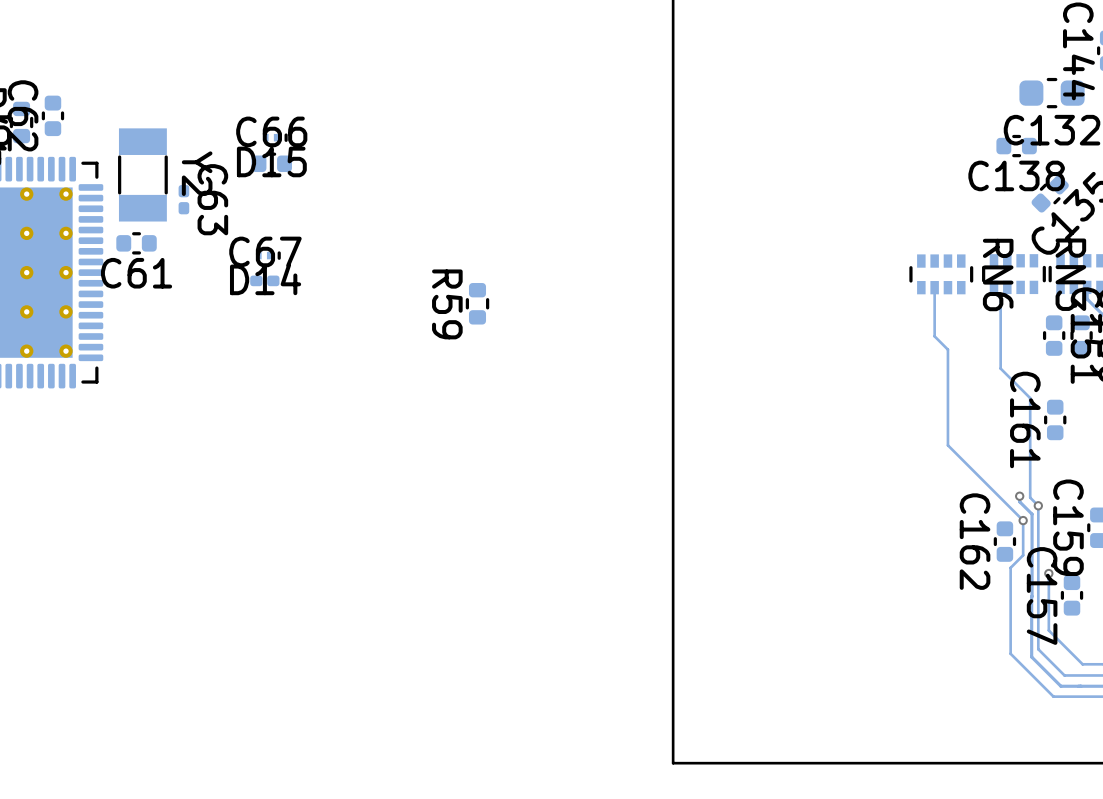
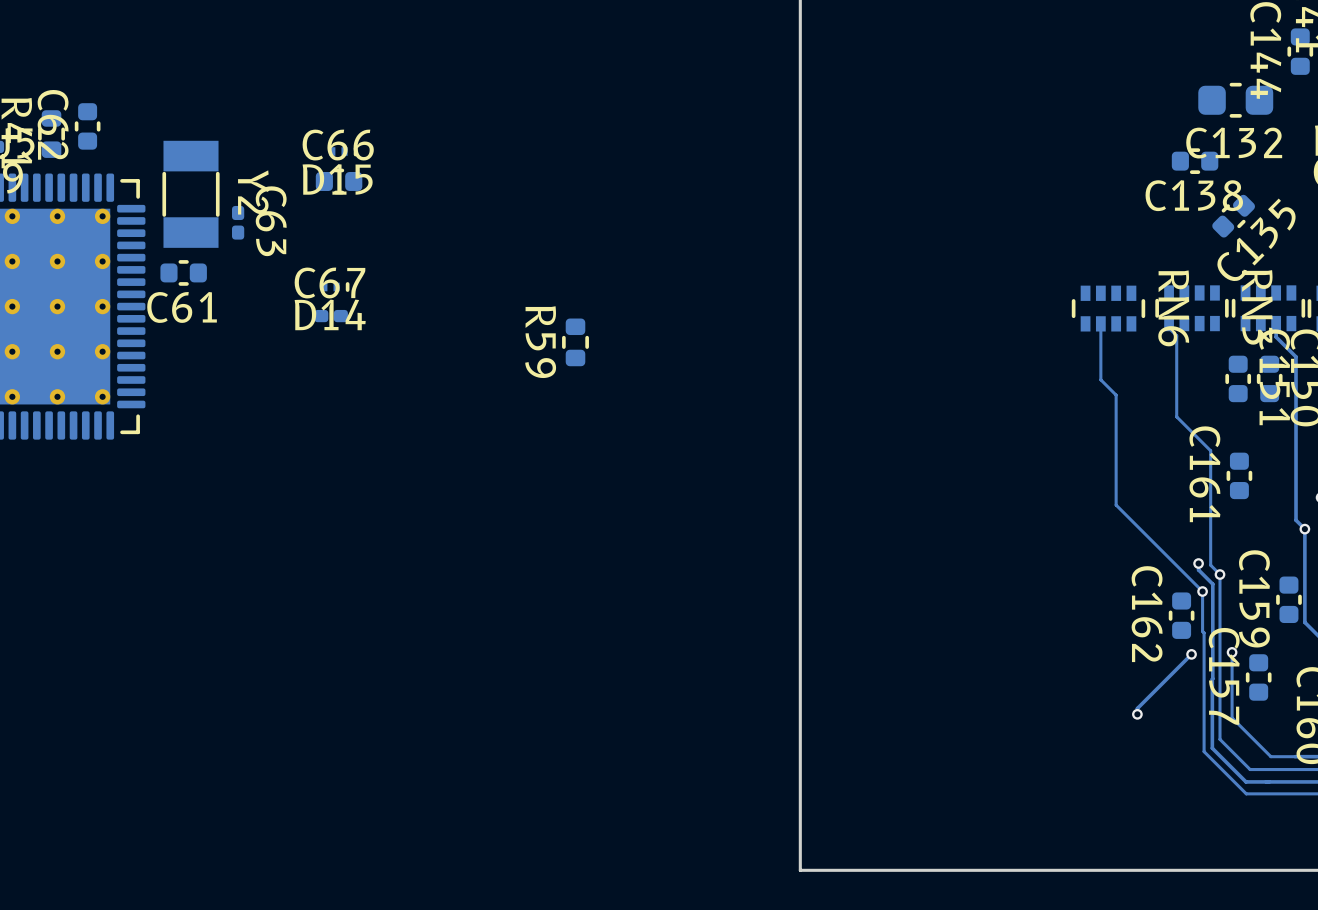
track: (1023, 555) (1010, 567) (1010, 653) (1053, 696) (1061, 696) -> (1202, 631) (1204, 751) (1246, 793)
track: none -> (1191, 654) (1137, 708) (1137, 714)
via: none -> (1191, 654)
via: none -> (1137, 714)

